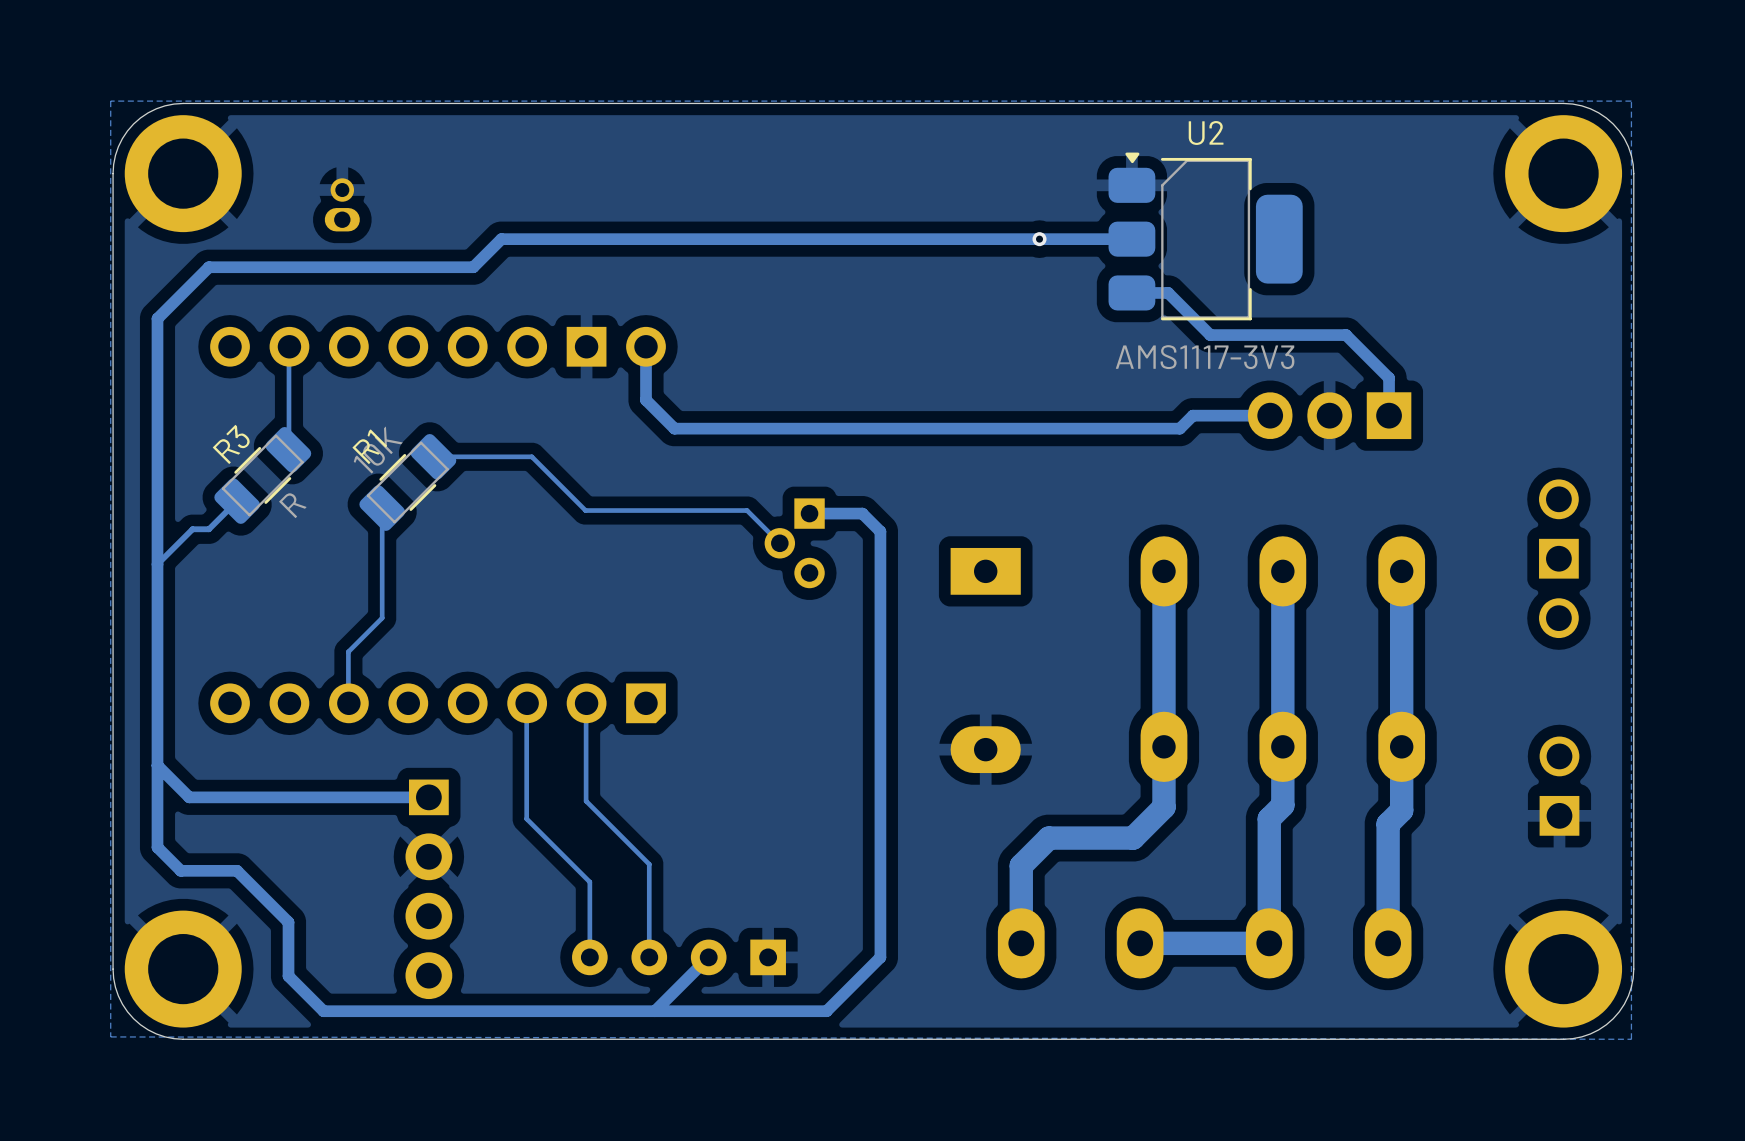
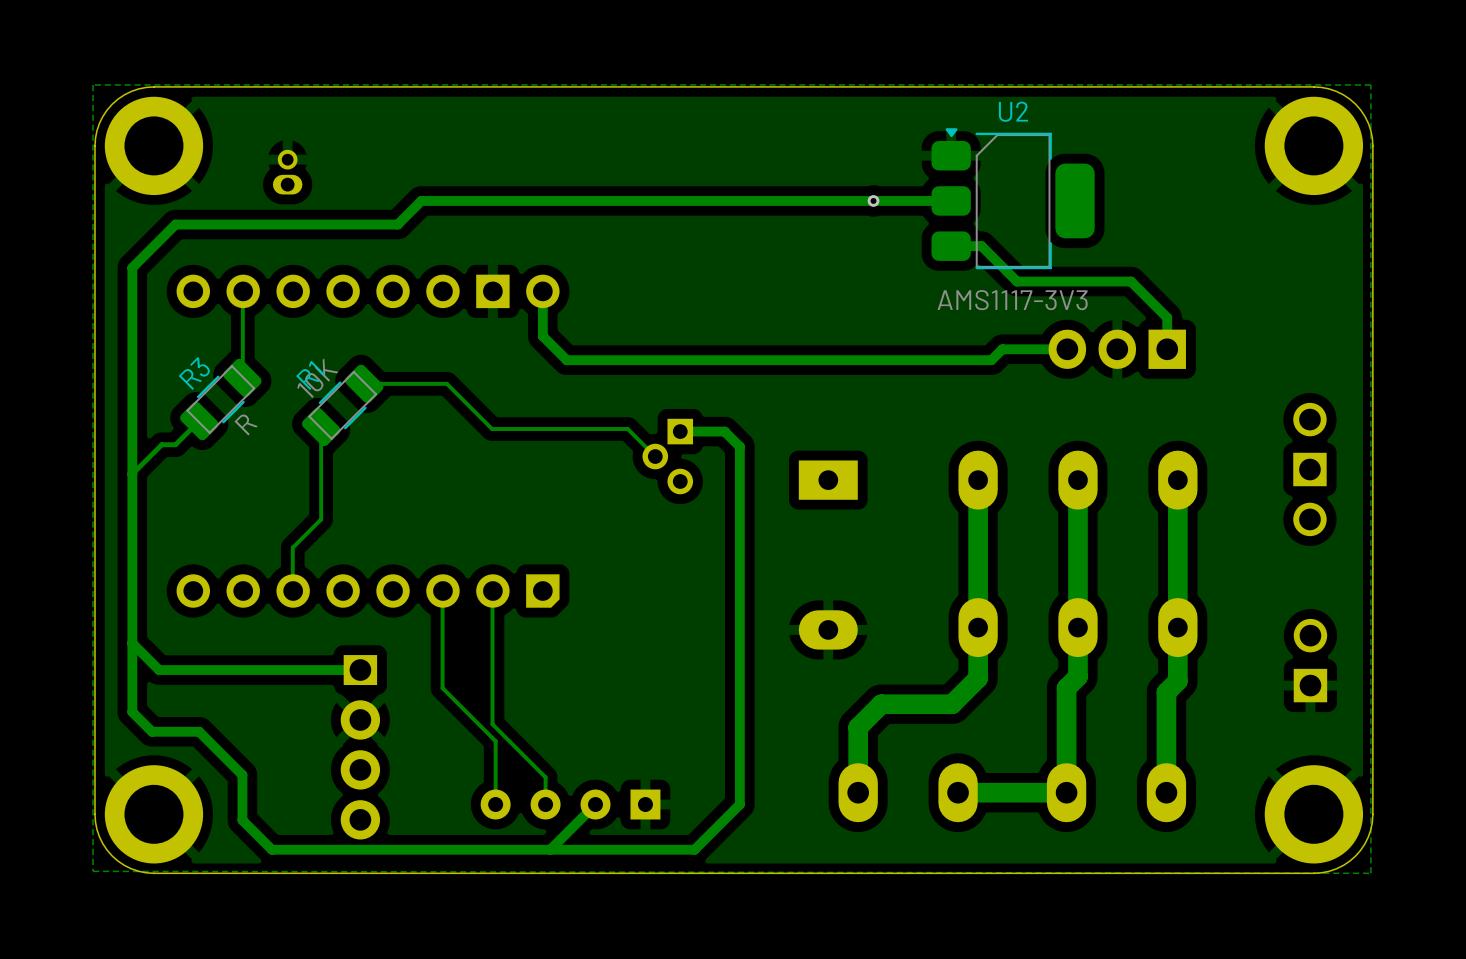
track: (586, 801) (649, 864) (649, 925) -> (492, 673) (492, 724) (545, 777)

